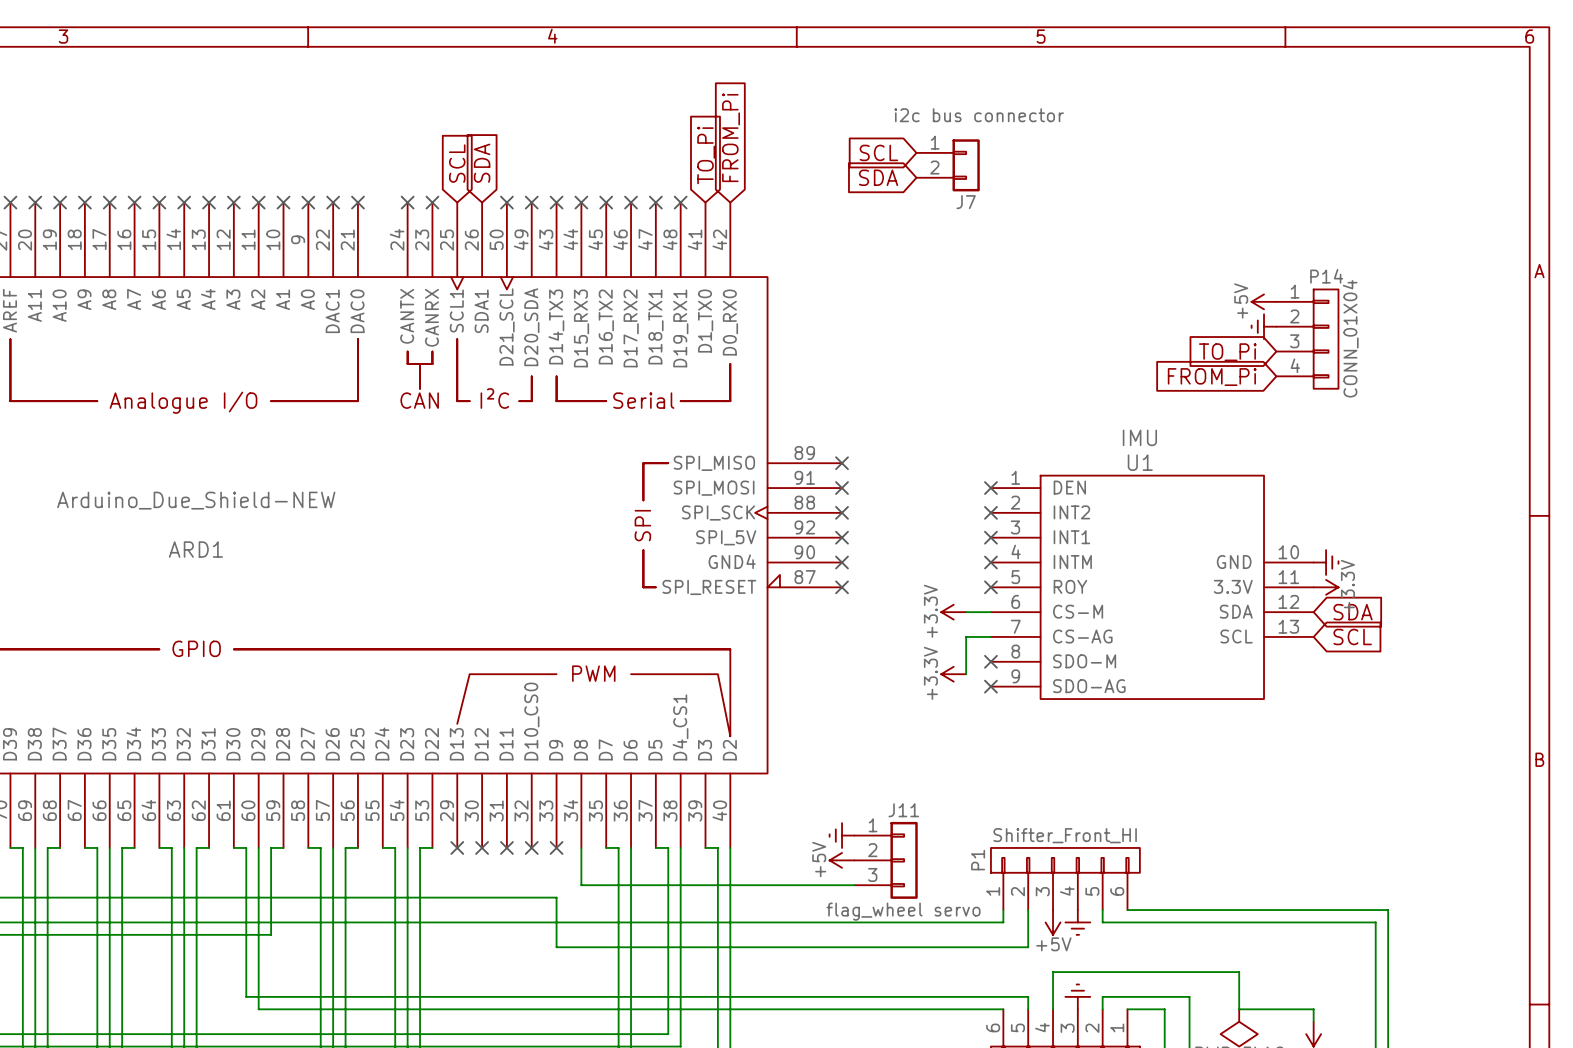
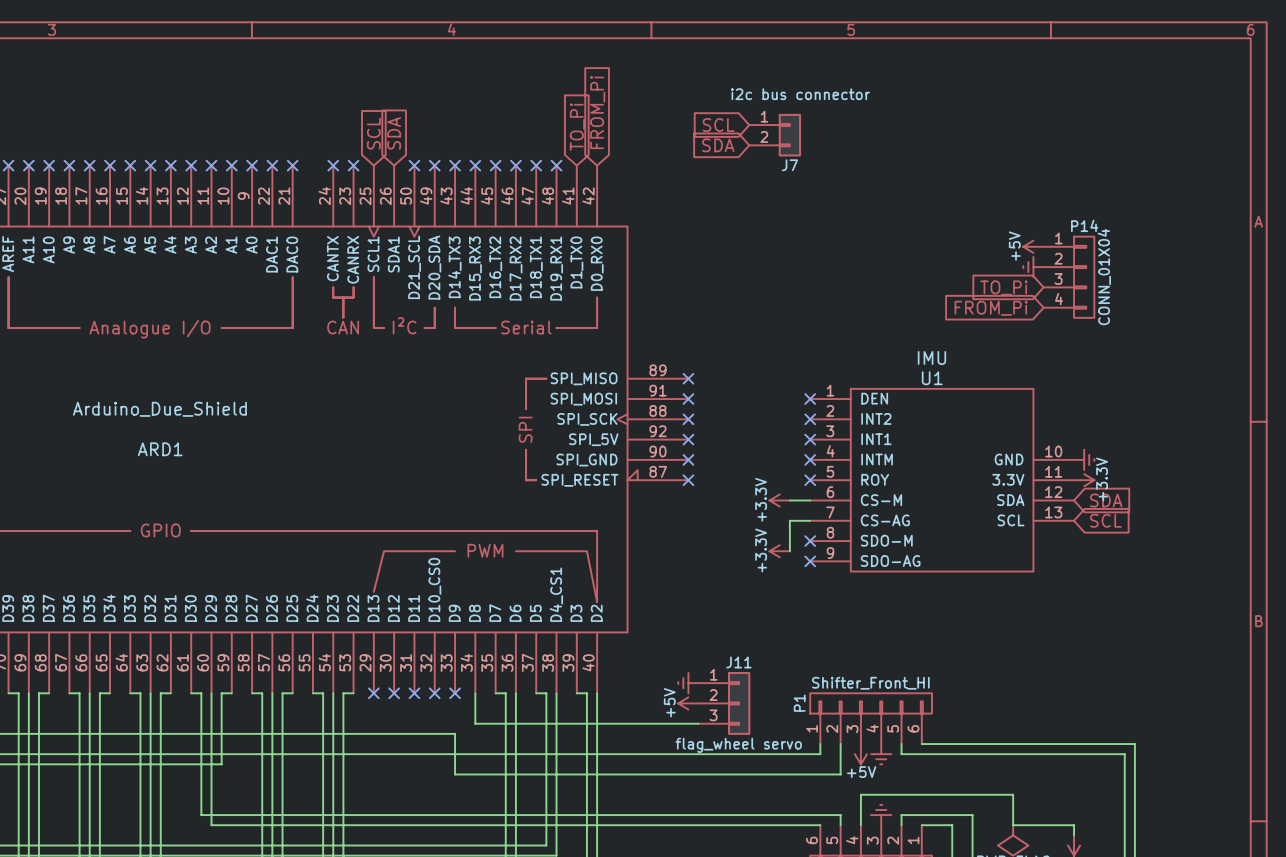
ARD1 value: Arduino_Due_Shield-NEW (196, 500) -> Arduino_Due_Shield (159, 409)
ARD1 pin name: GND4 (732, 561) -> SPI_GND (586, 460)

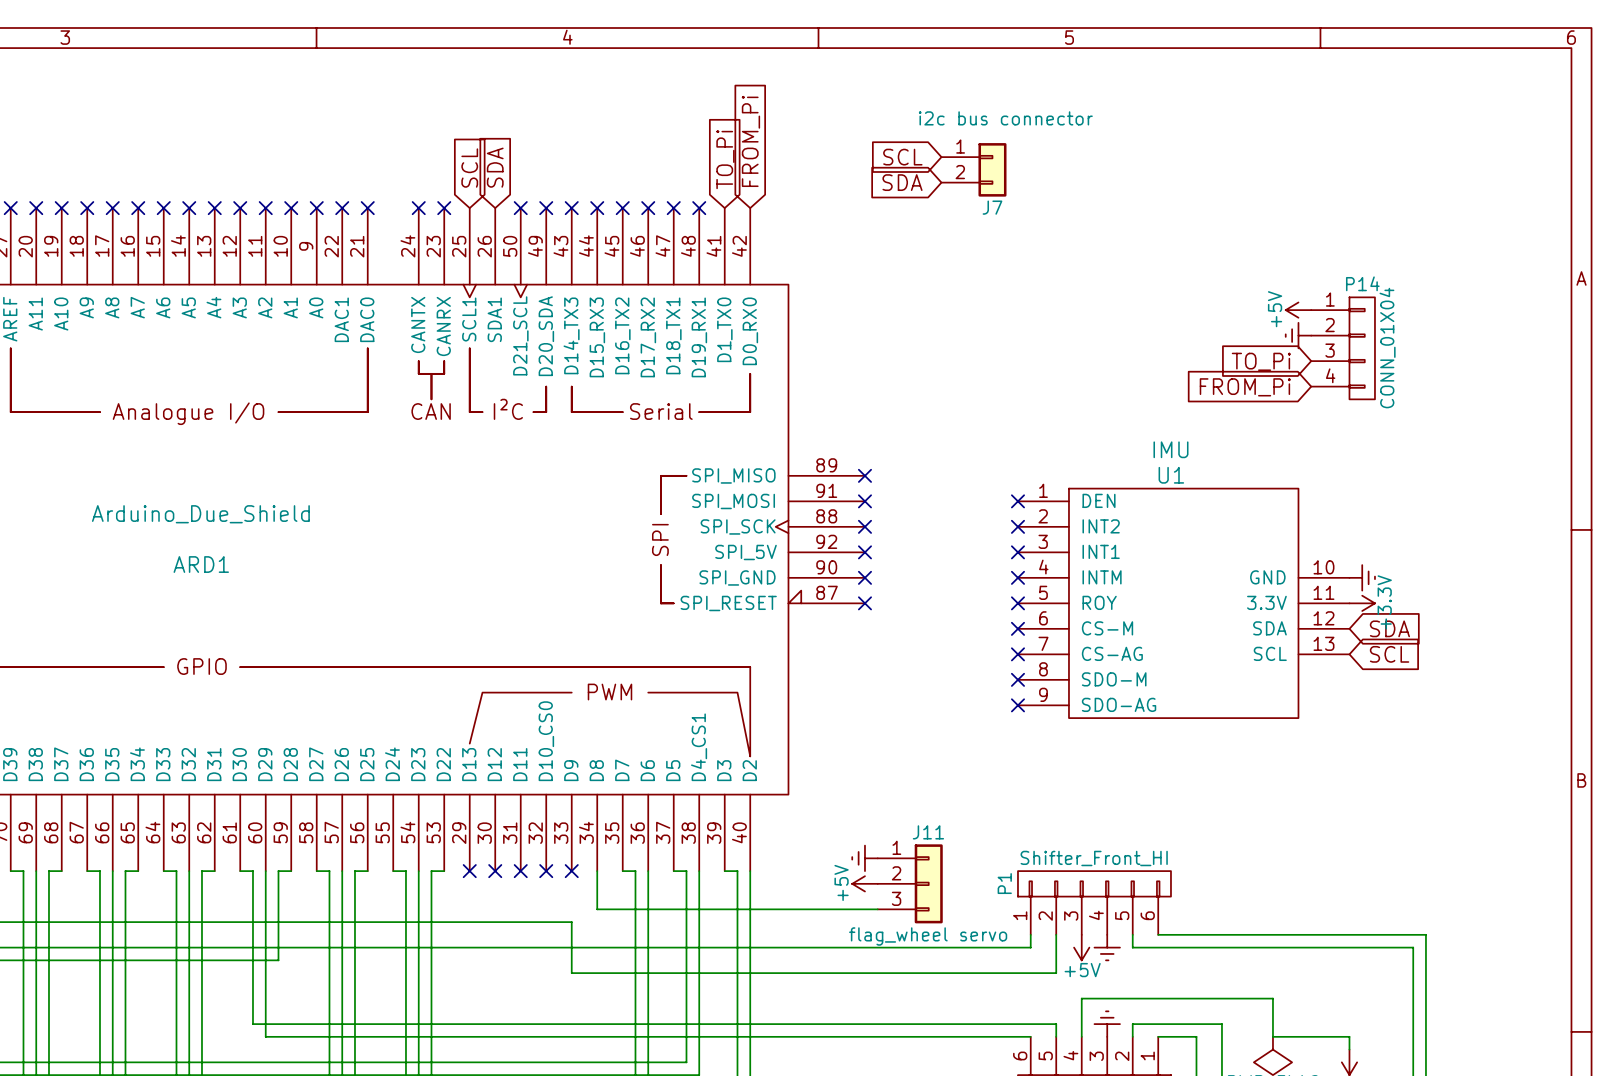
power symbol: +3.3V (779, 500) -> none
wire: (789, 500) (810, 500) -> none
no-connect mark: none -> (1017, 628)
wire: (810, 520) (789, 520) (789, 551) -> none
no-connect mark: none -> (1017, 654)
power symbol: +3.3V (779, 551) -> none

